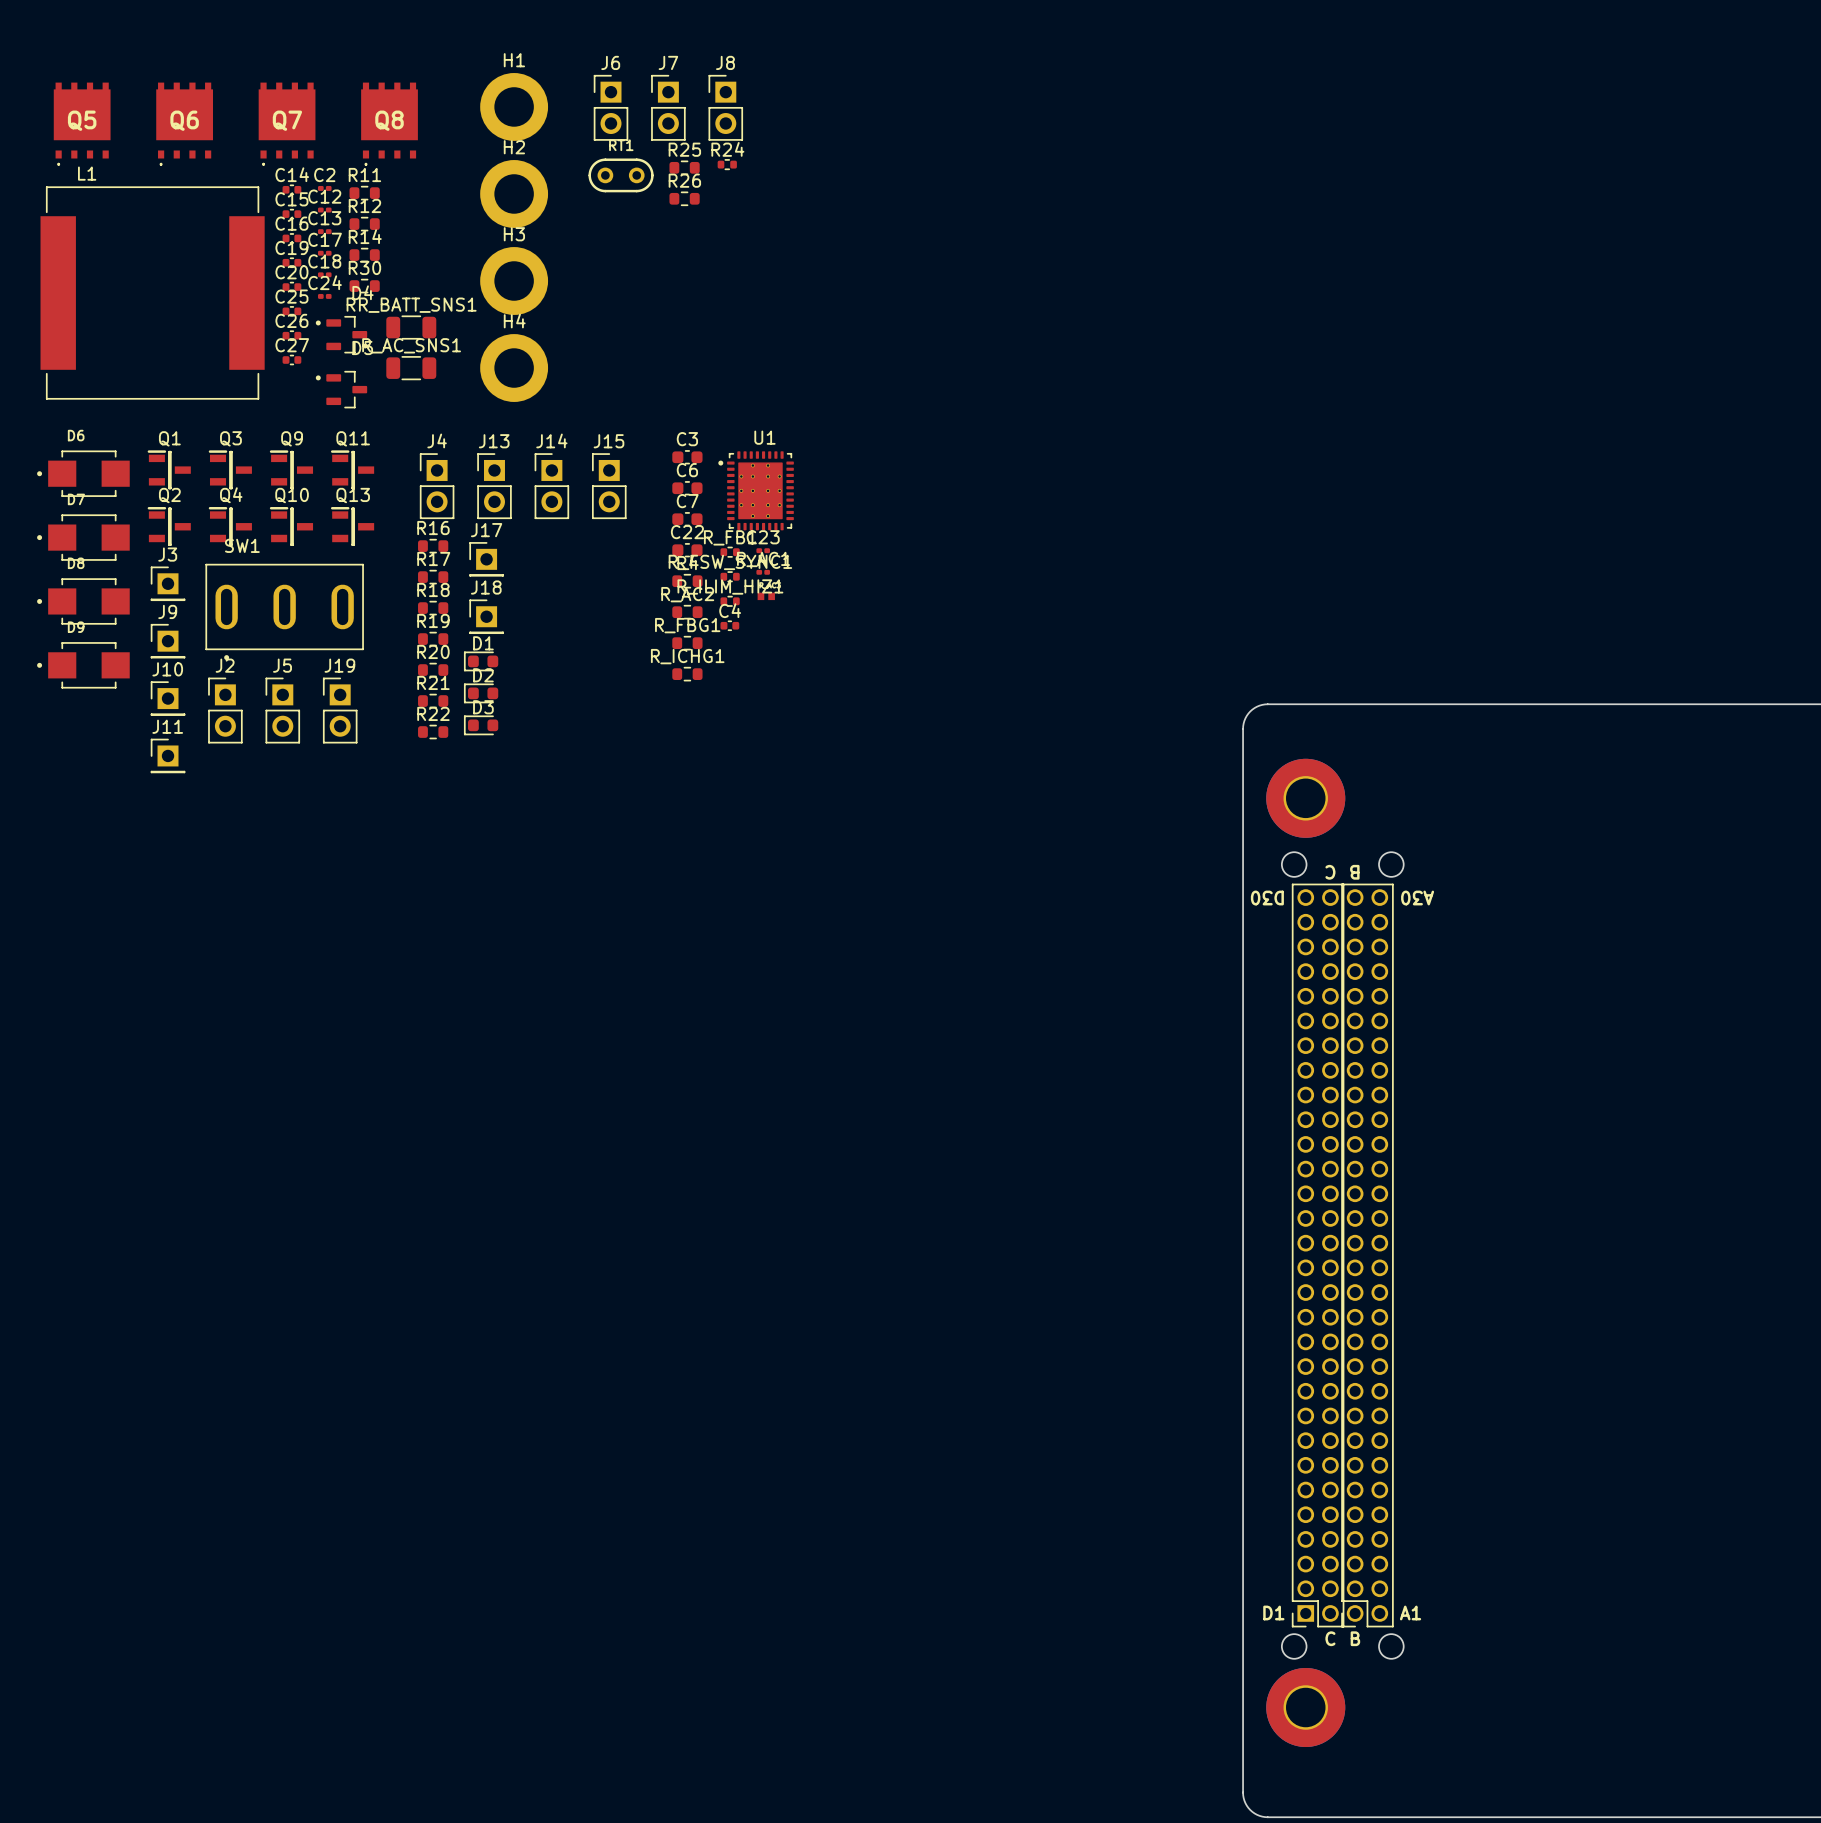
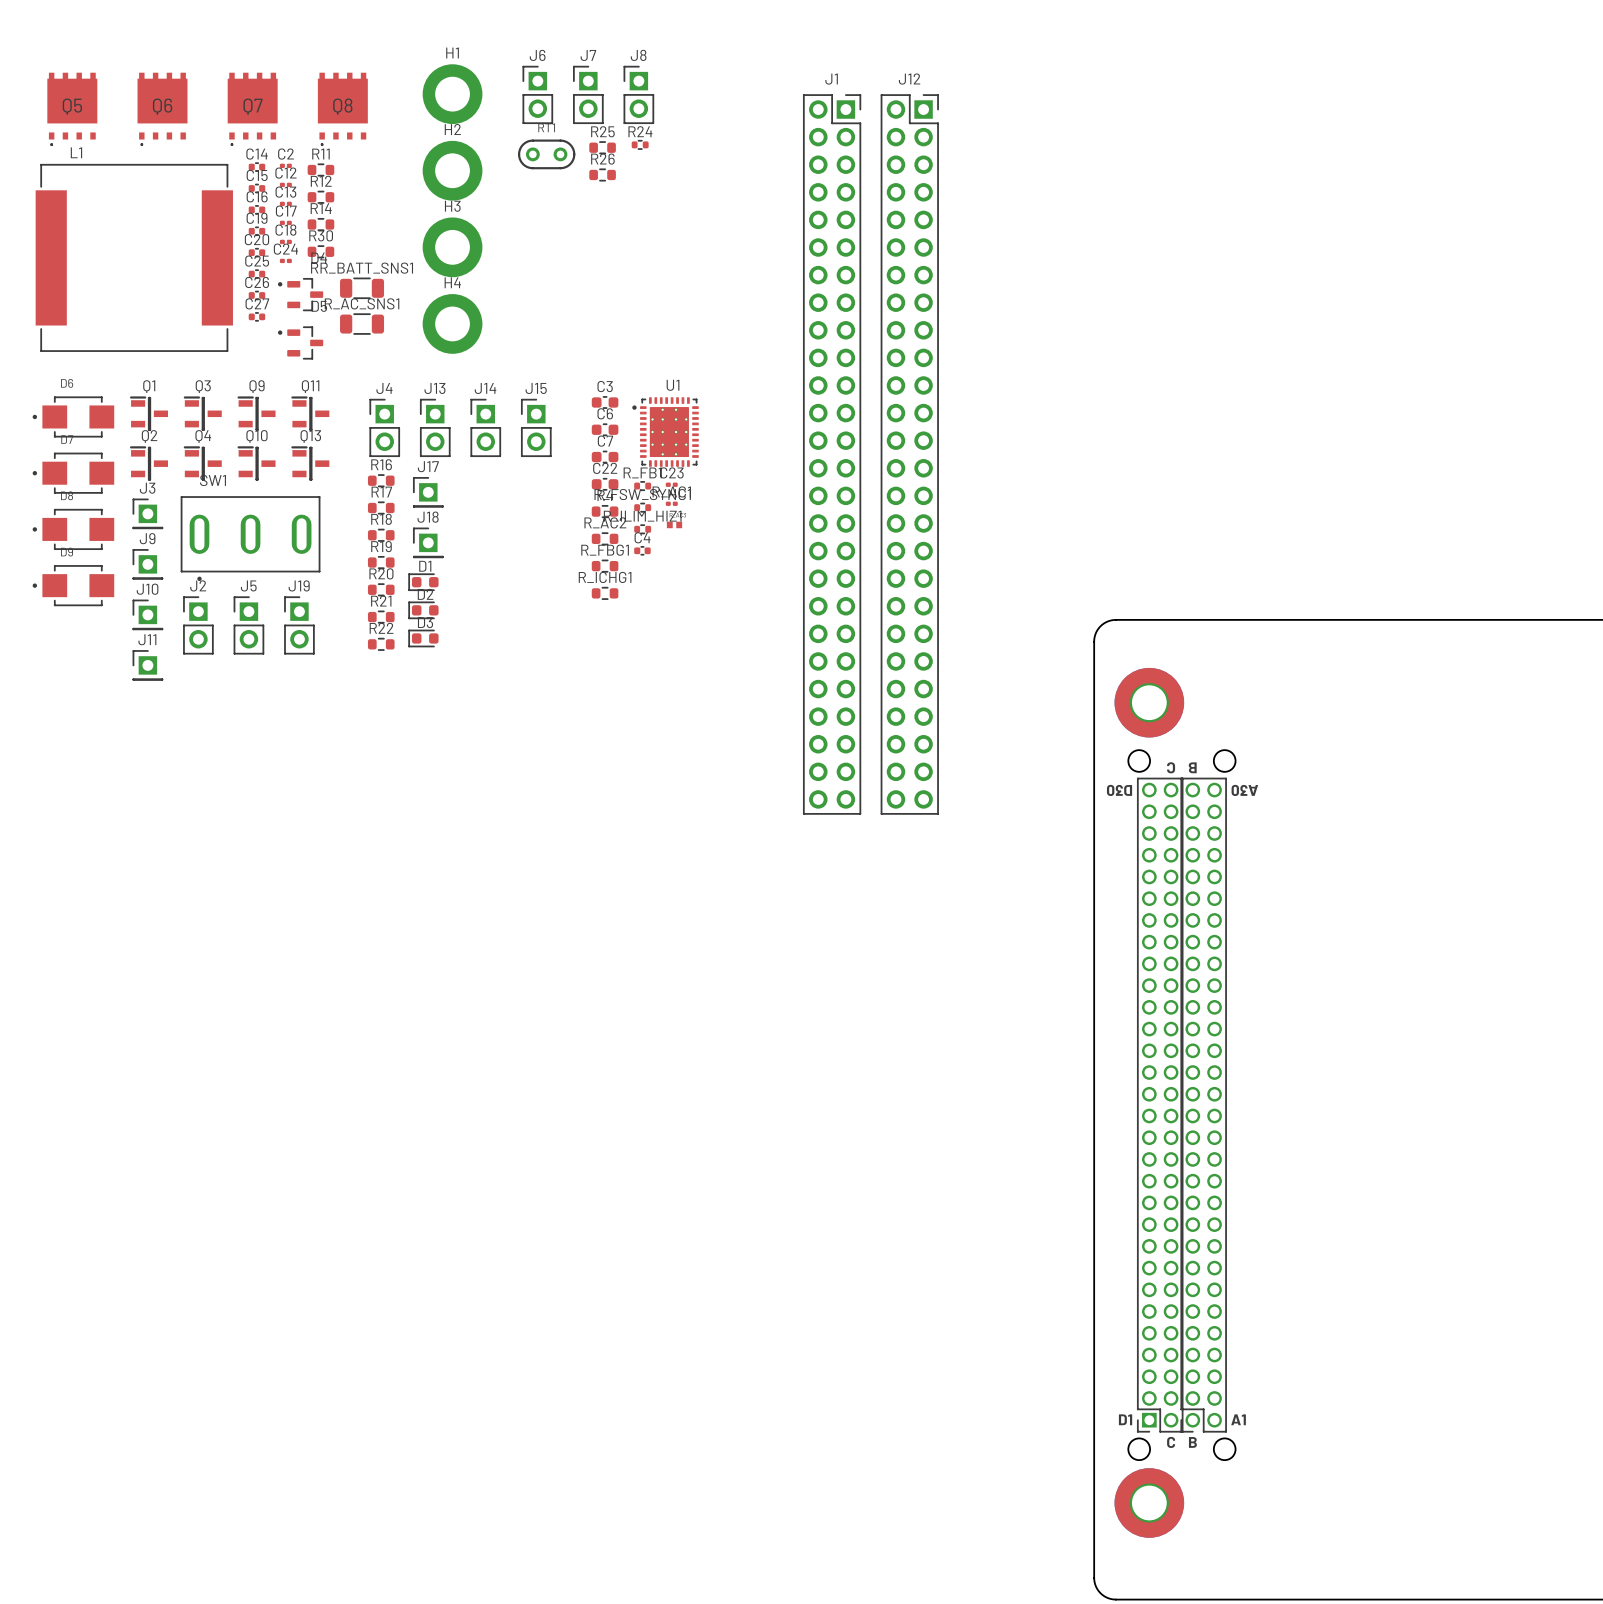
J1: none -> (832, 454)
J12: none -> (909, 454)

